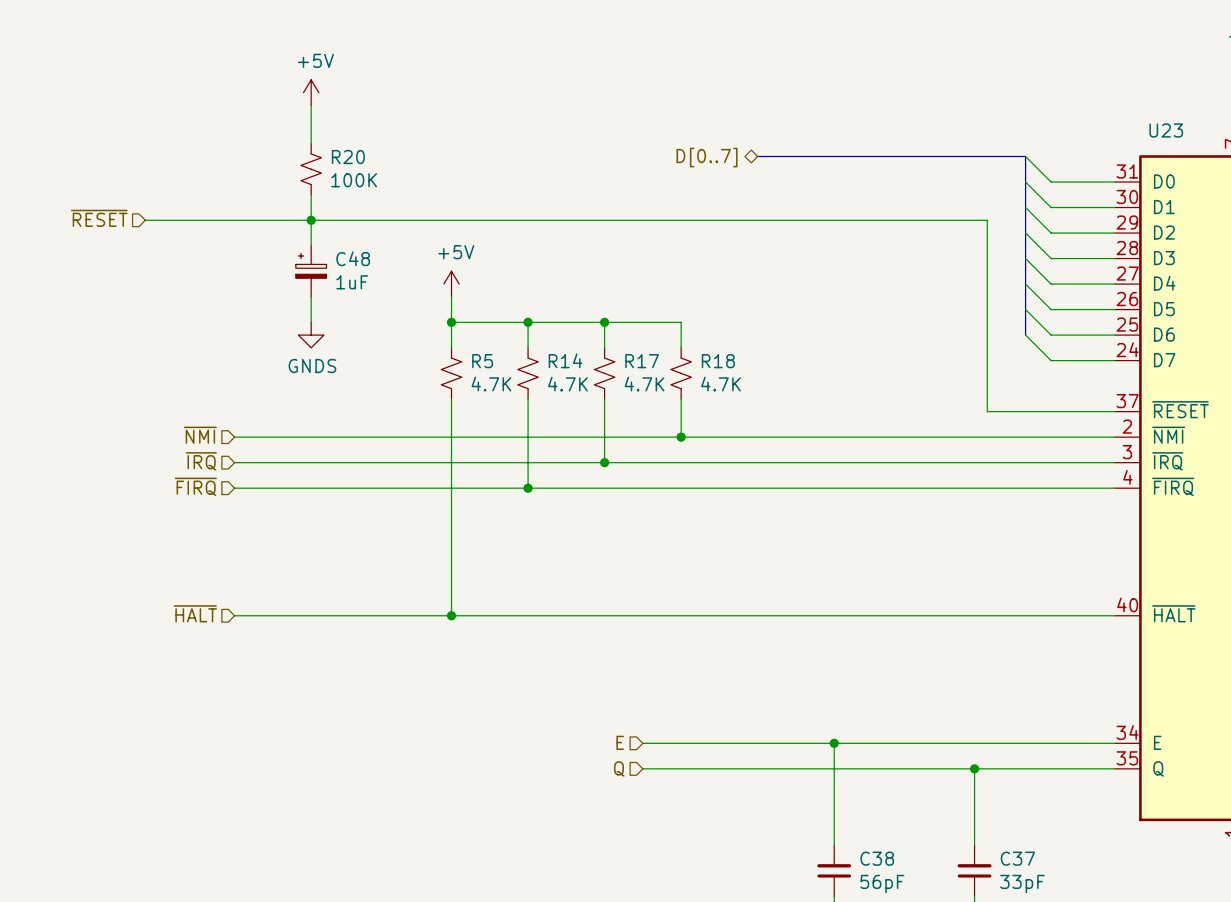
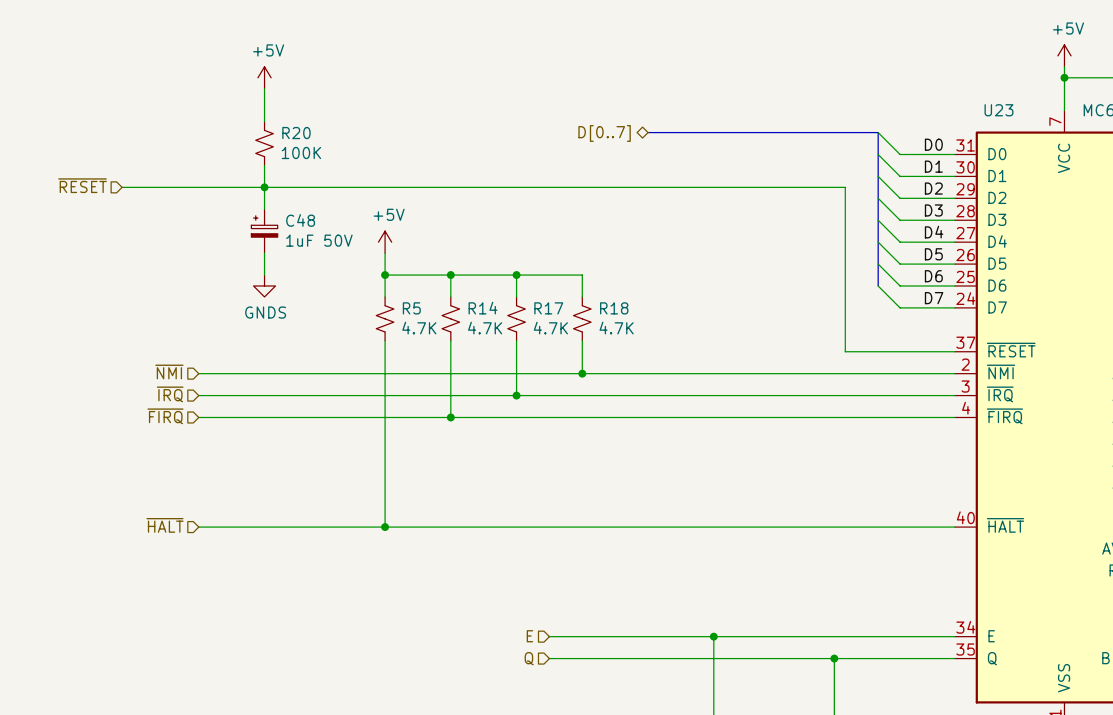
label: none -> D0 (933, 144)
label: none -> D1 (933, 166)
label: none -> D2 (933, 188)
label: none -> D3 (933, 210)
label: none -> D4 (934, 232)
C48 value: 1uF (352, 282) -> 1uF 50V (319, 240)
label: none -> D5 (933, 254)
label: none -> D6 (933, 276)
label: none -> D7 (934, 298)

